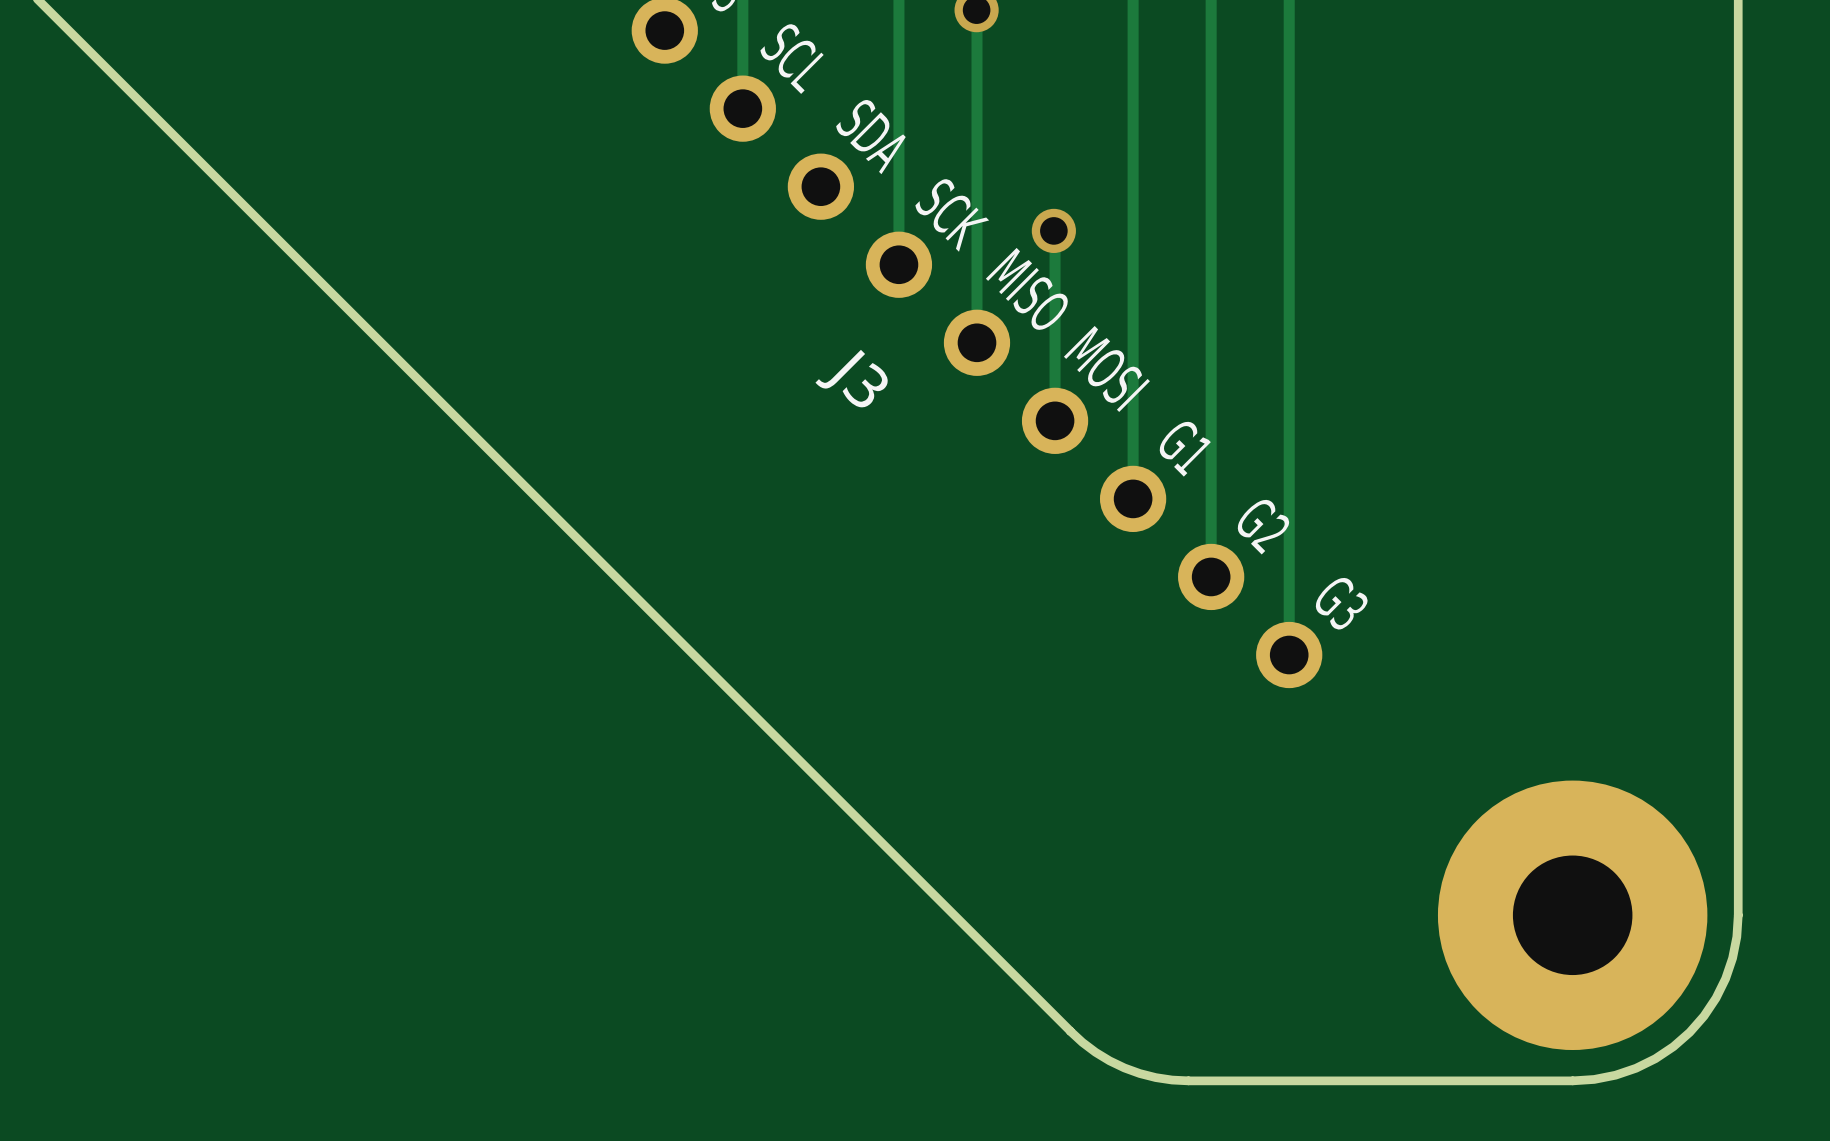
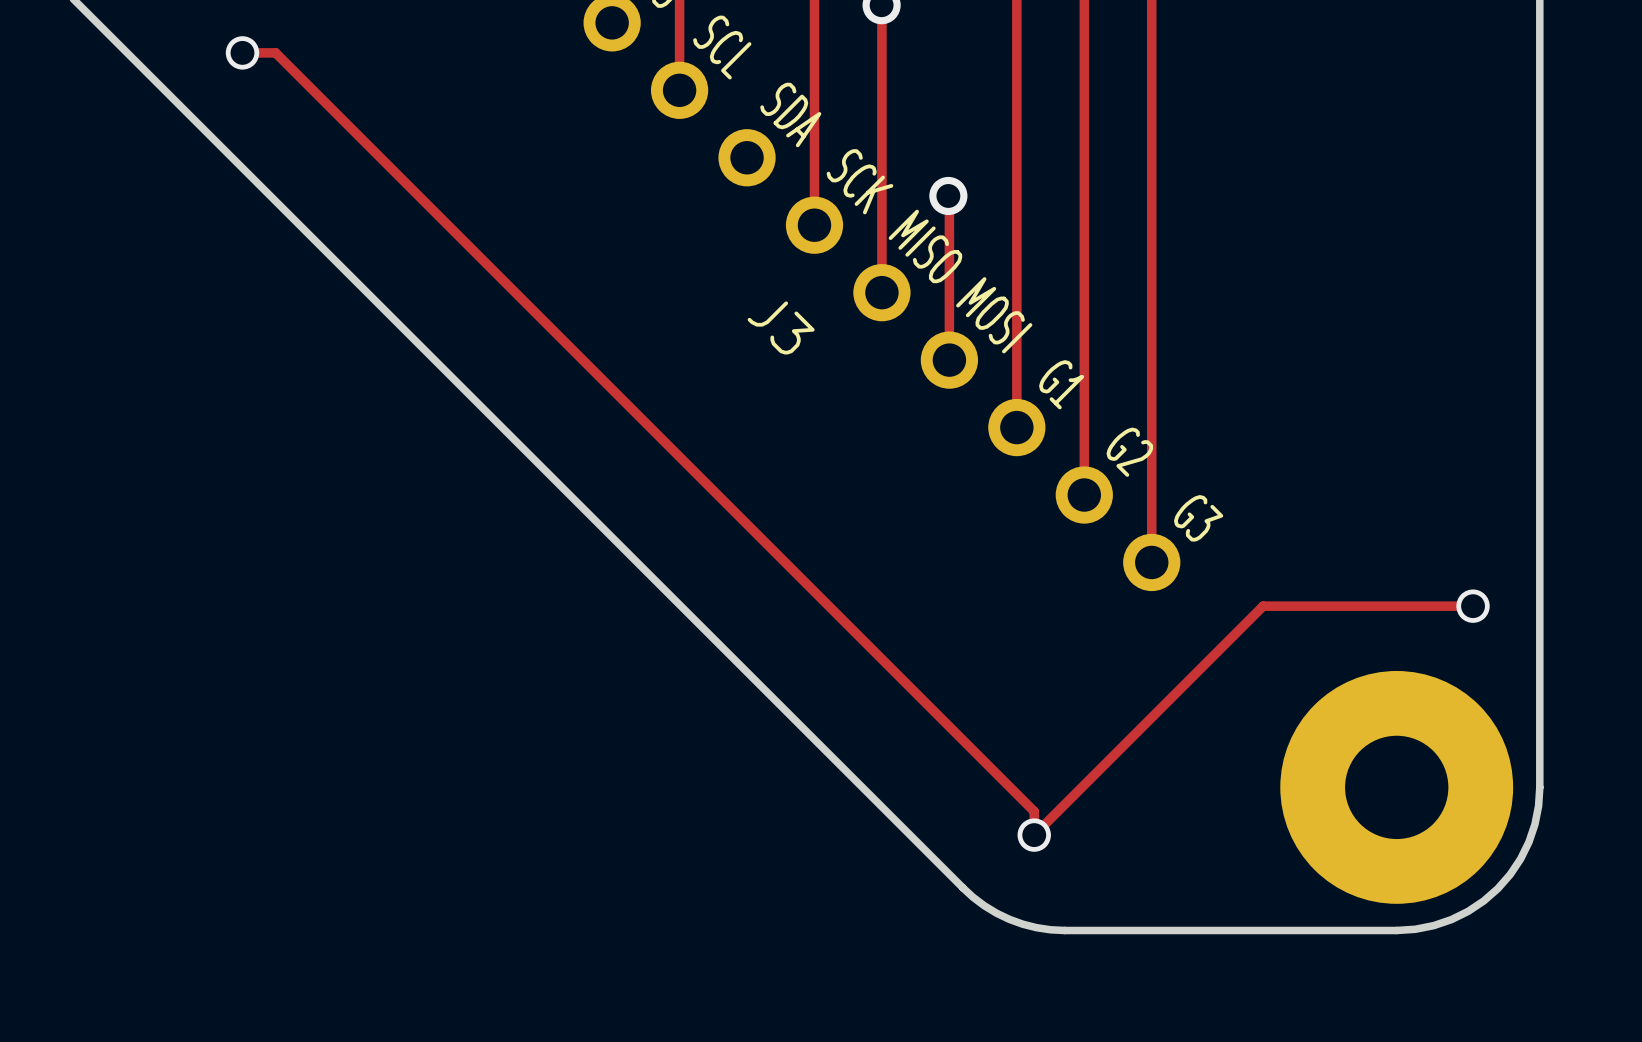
track: none -> (242, 52) (275, 52) (1034, 811) (1034, 835) (1263, 606) (1473, 606)
via: none -> (242, 52)
via: none -> (1473, 606)
via: none -> (1034, 835)

